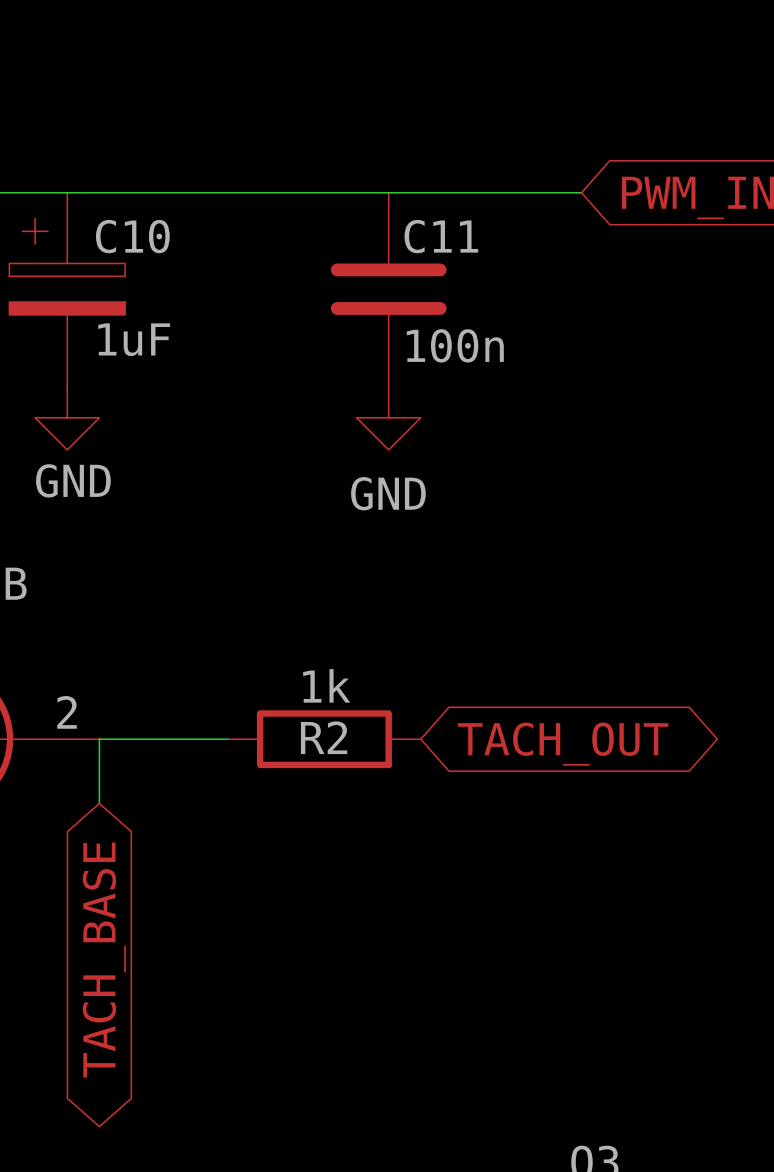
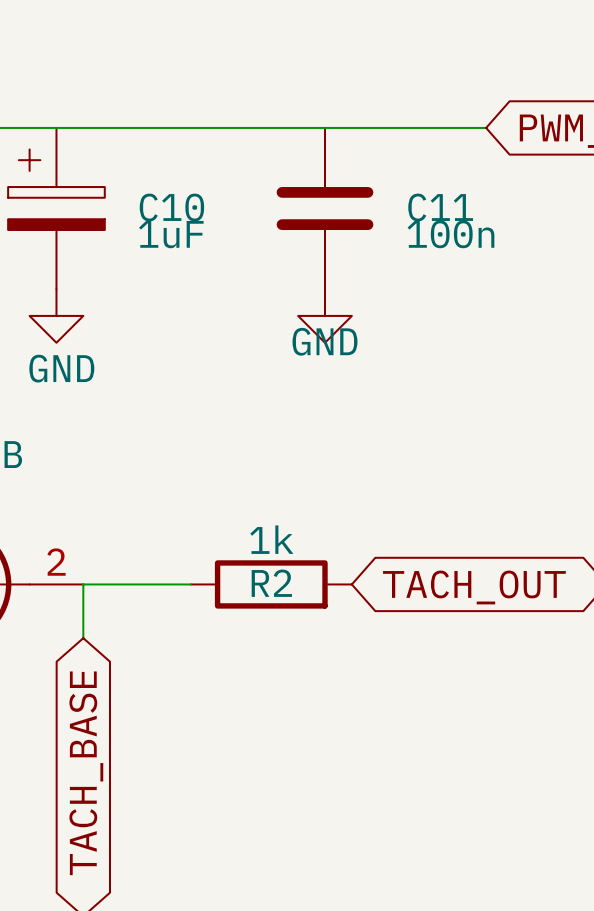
C10 name position: C10 (132, 236) -> C10 (171, 207)
C11 name position: C11 (441, 236) -> C11 (440, 207)
C10 value position: 1uF (134, 339) -> 1uF (171, 234)
C11 value position: 100n (455, 345) -> 100n (450, 234)
power symbol text position: GND (388, 493) -> GND (325, 341)

